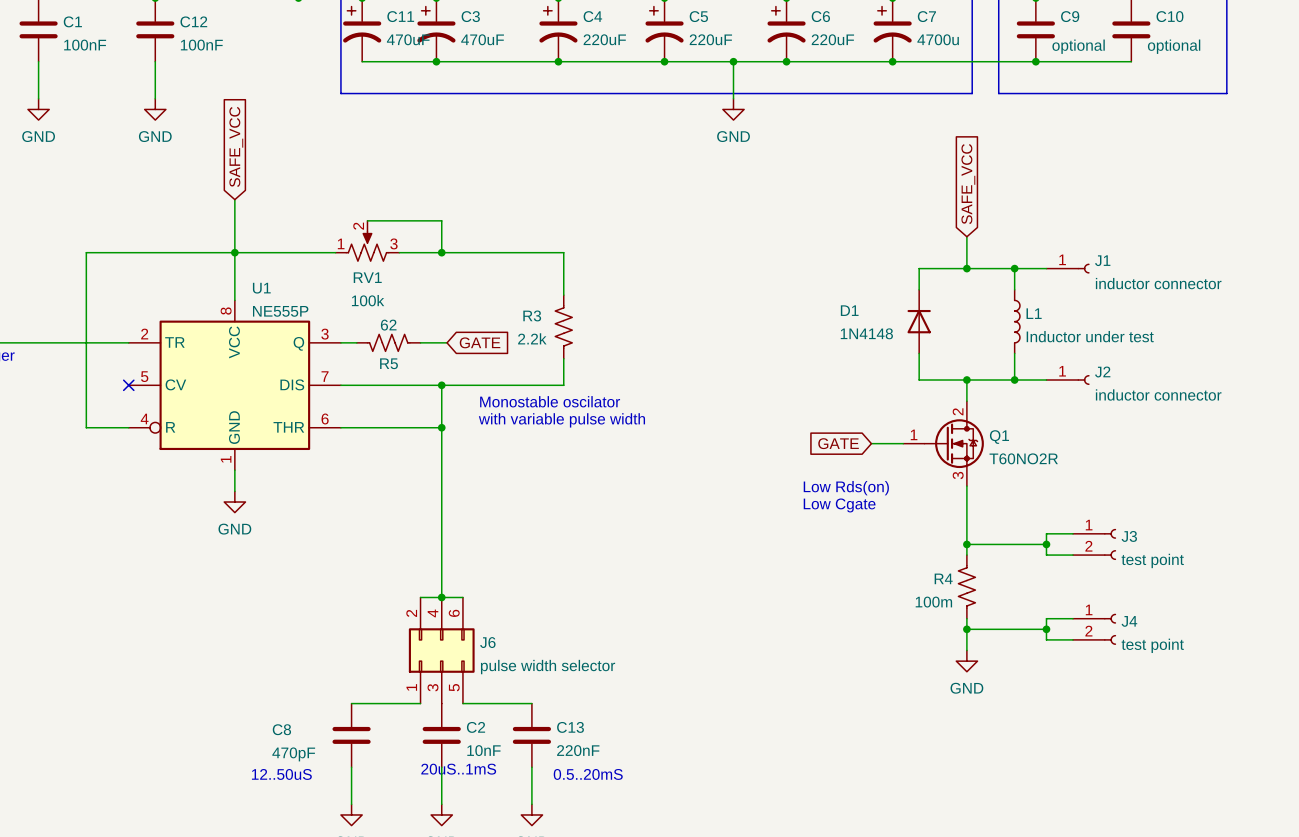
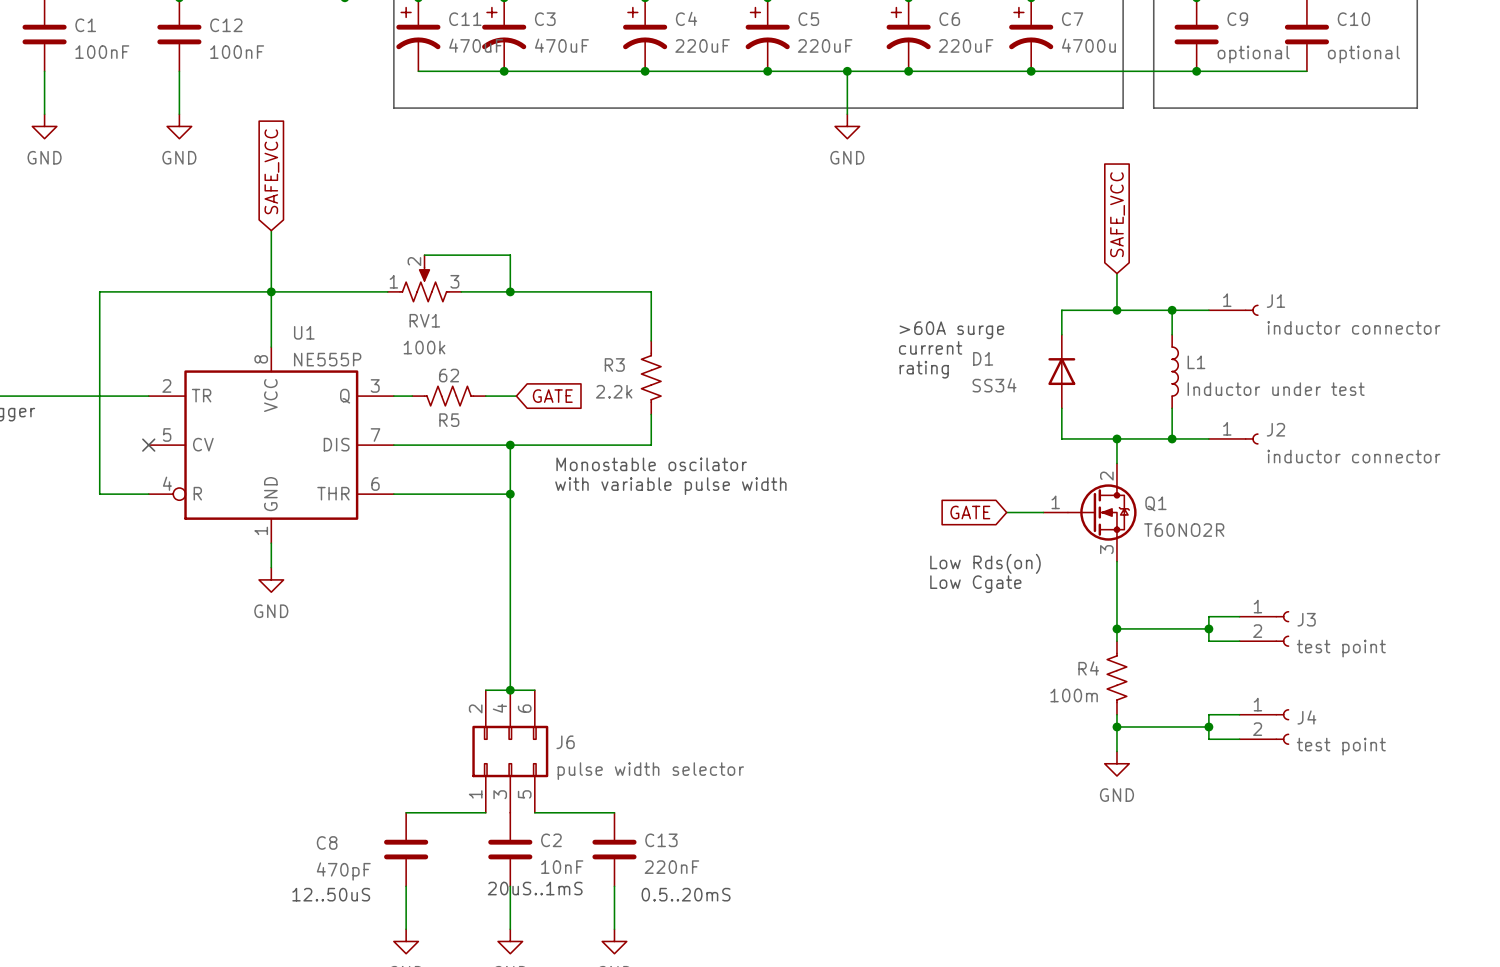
text: none -> >60A surge (951, 330)
text: none -> current (930, 347)
text: none -> rating (924, 369)
D1 value: 1N4148 (866, 333) -> SS34 (994, 385)

